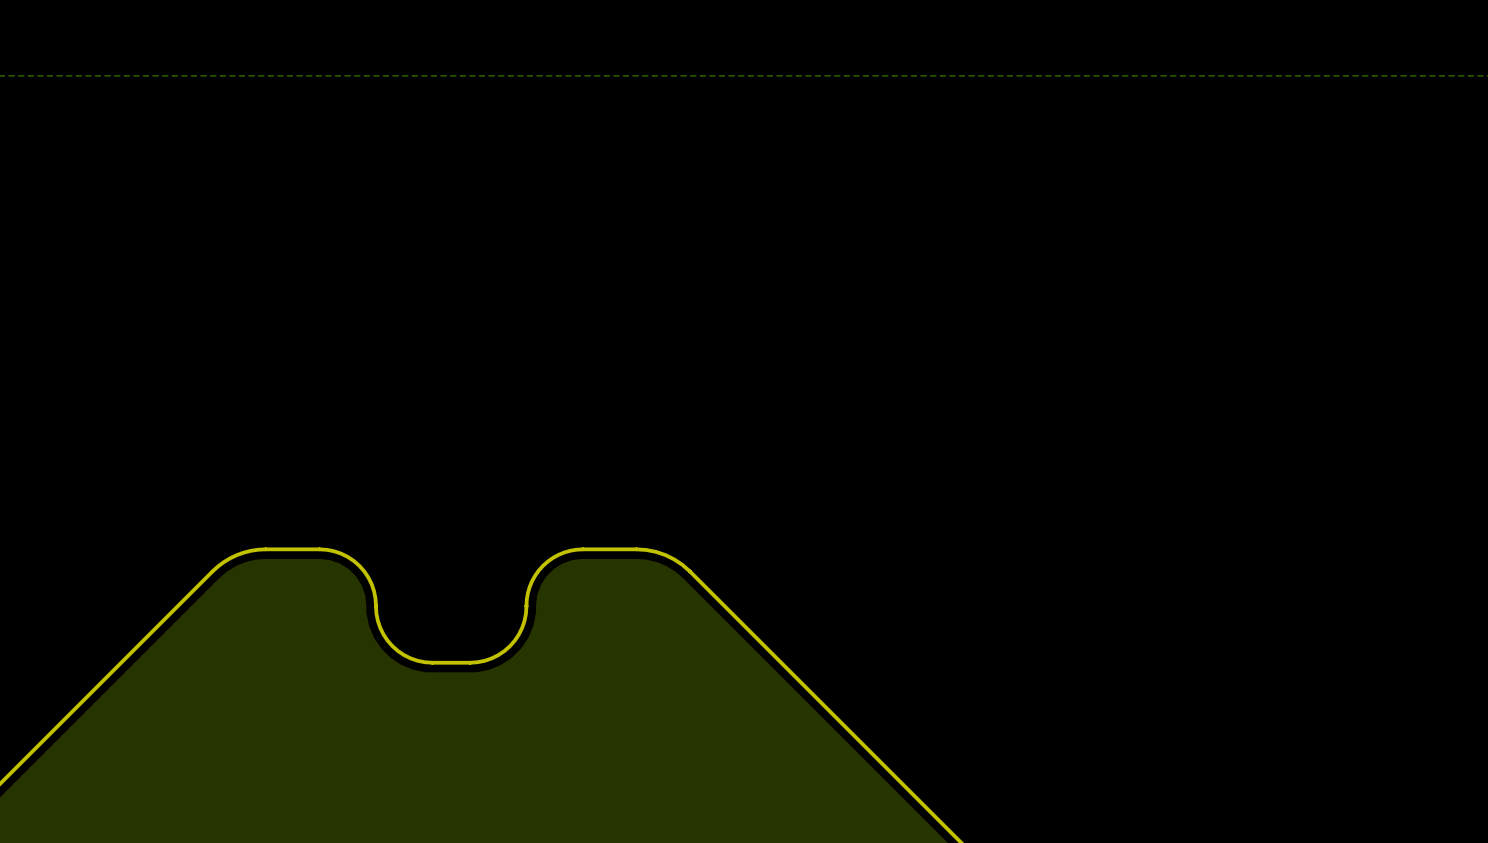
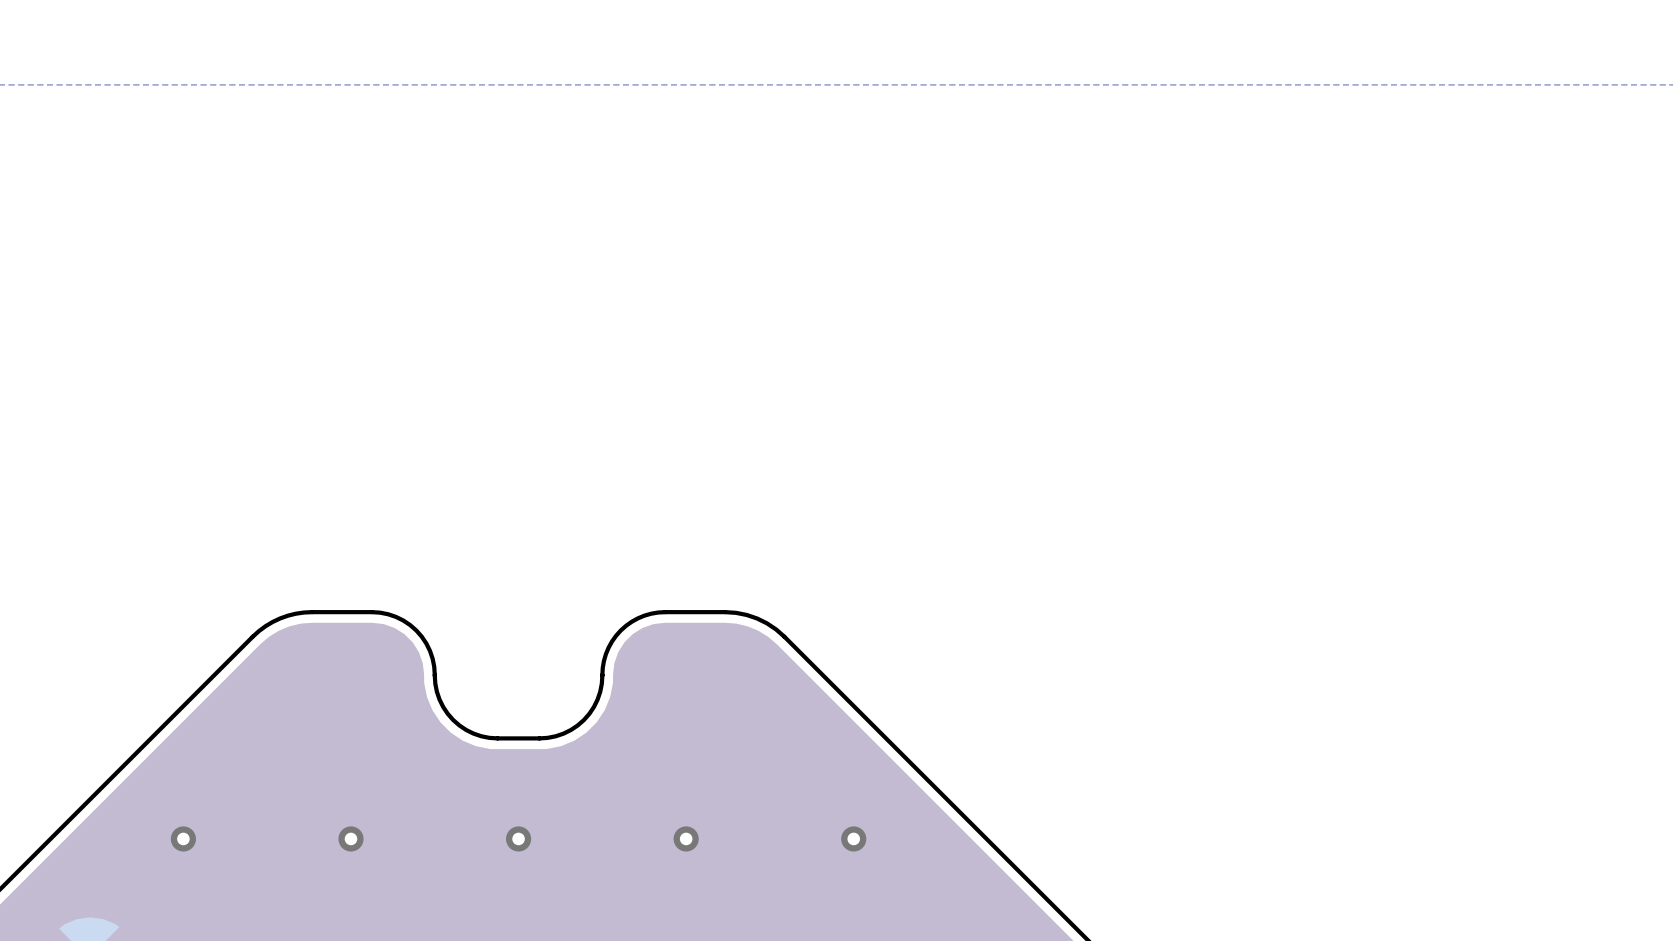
via: none -> (183, 838)
via: none -> (350, 838)
via: none -> (518, 838)
via: none -> (686, 838)
via: none -> (853, 838)

